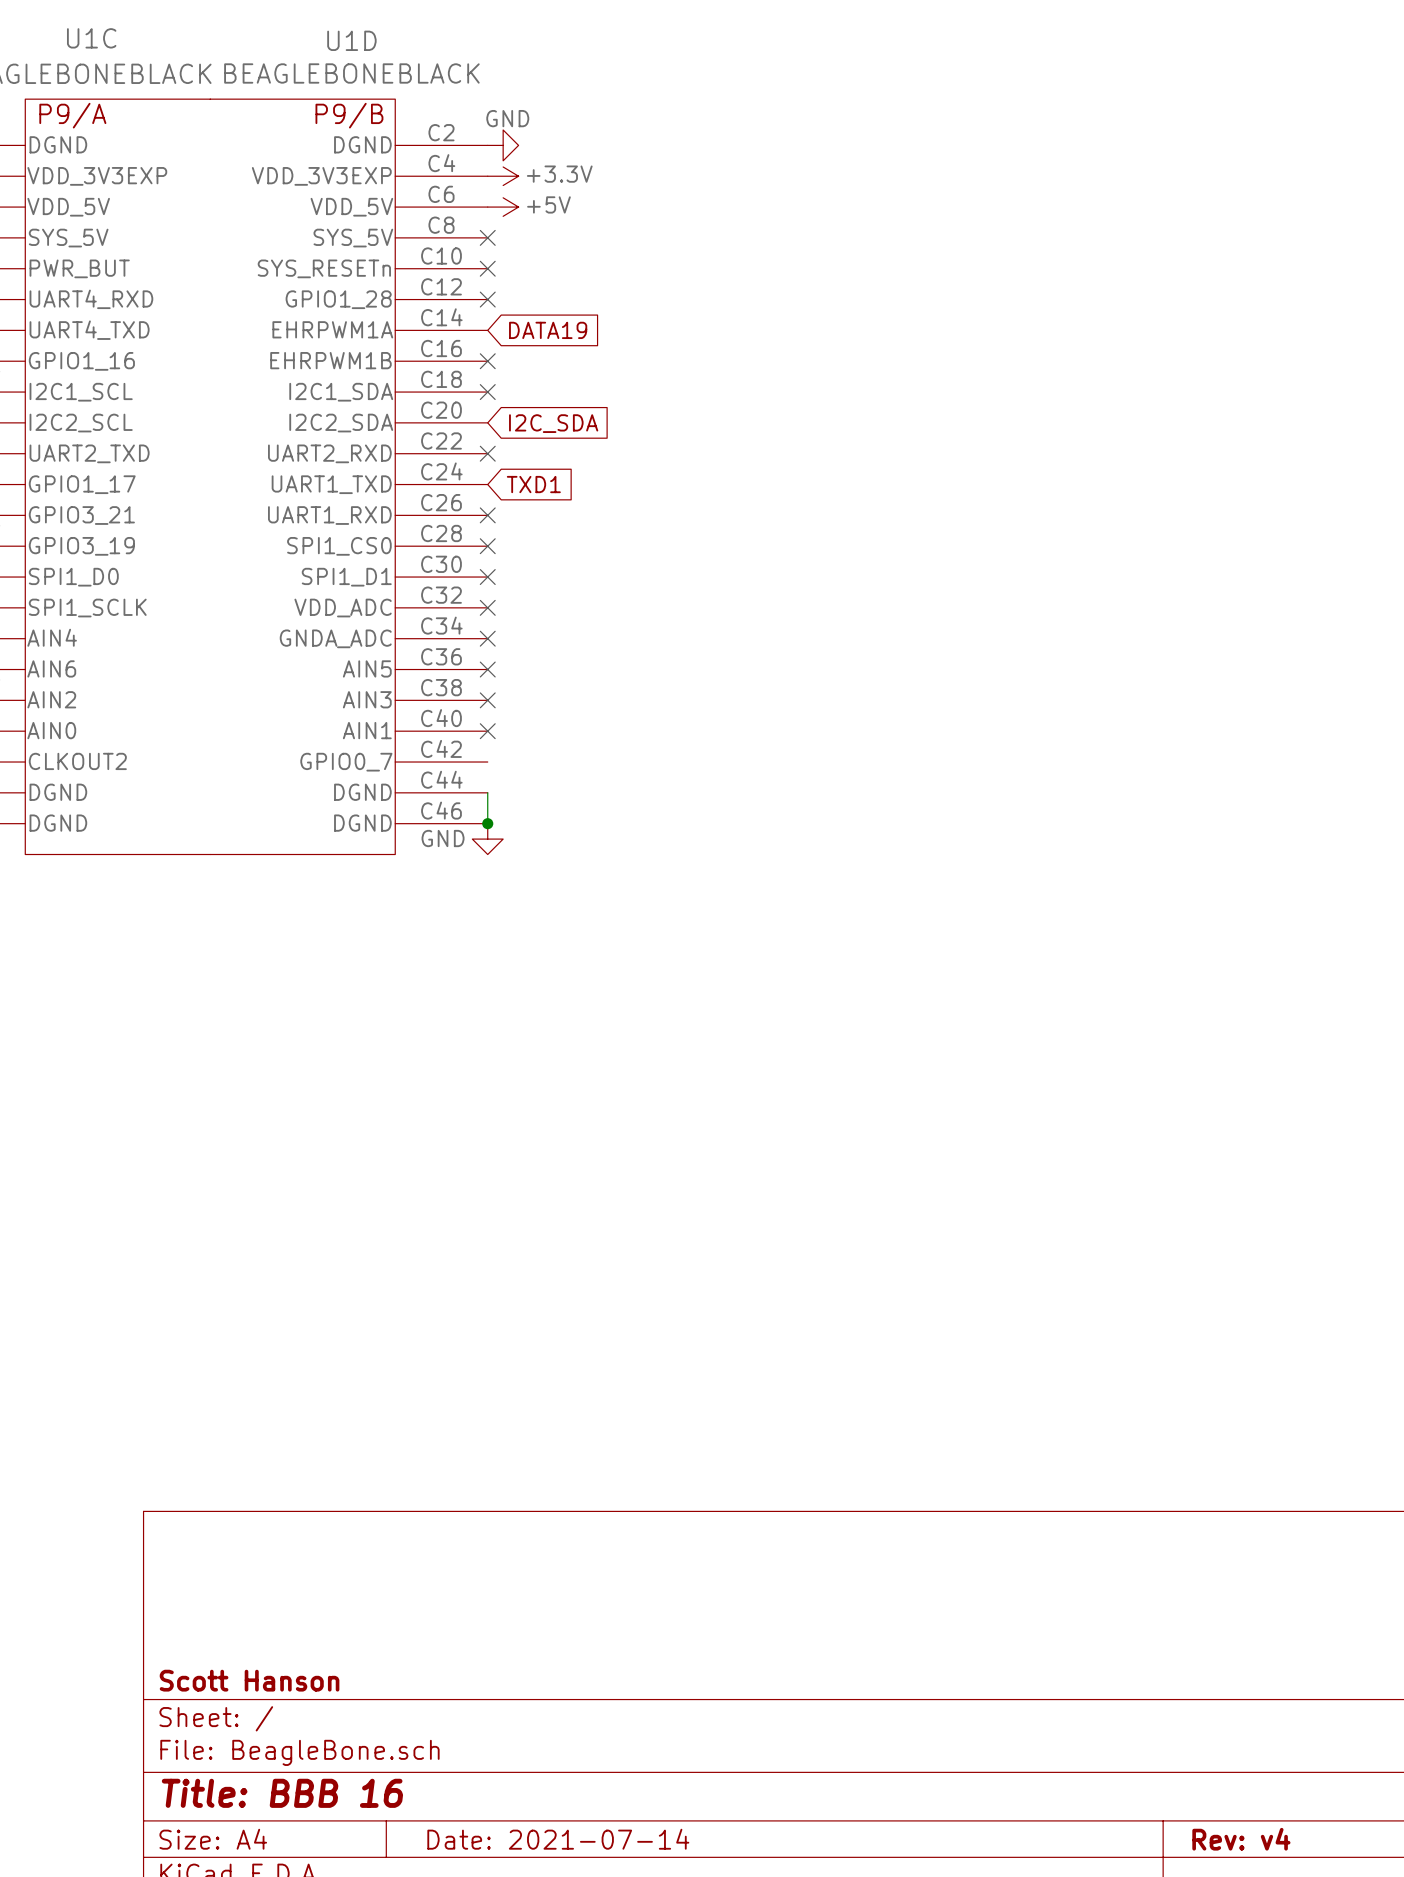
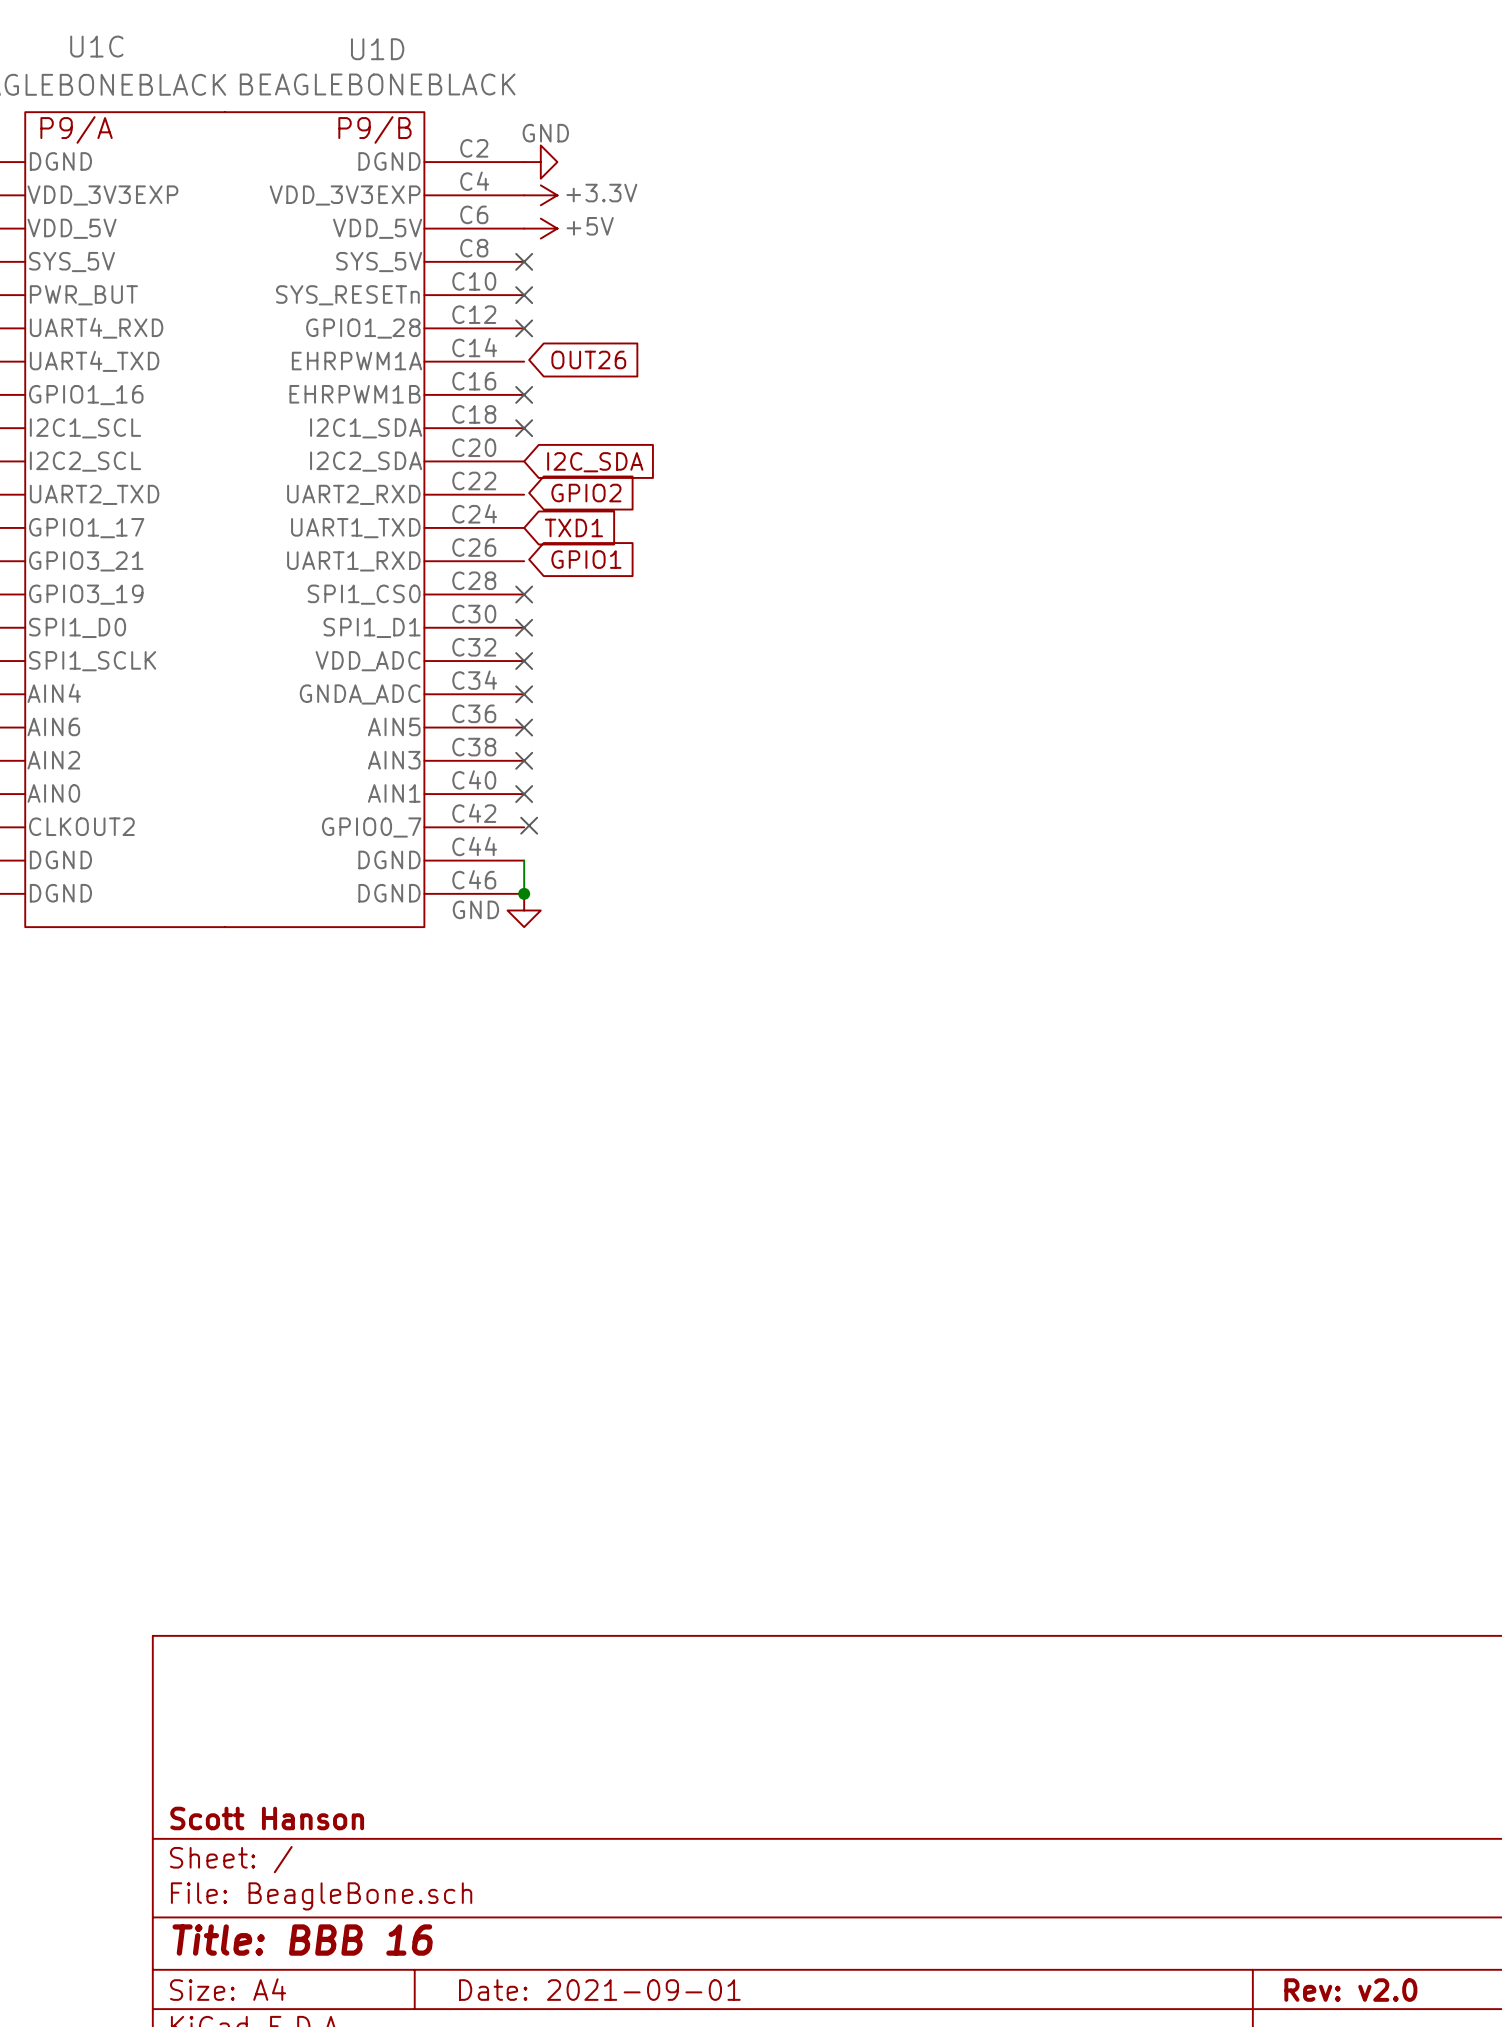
global label: DATA19 (548, 330) -> OUT26 (588, 359)
global label: none -> GPIO2 (586, 493)
no-connect mark: (487, 453) -> none
global label: none -> GPIO1 (586, 559)
no-connect mark: (487, 515) -> none
no-connect mark: none -> (529, 825)
title block: Date: 2021-07-14 (558, 1839) -> Date: 2021-09-01 (599, 1990)
title block: Rev: v4 (1241, 1839) -> Rev: v2.0 (1350, 1990)

